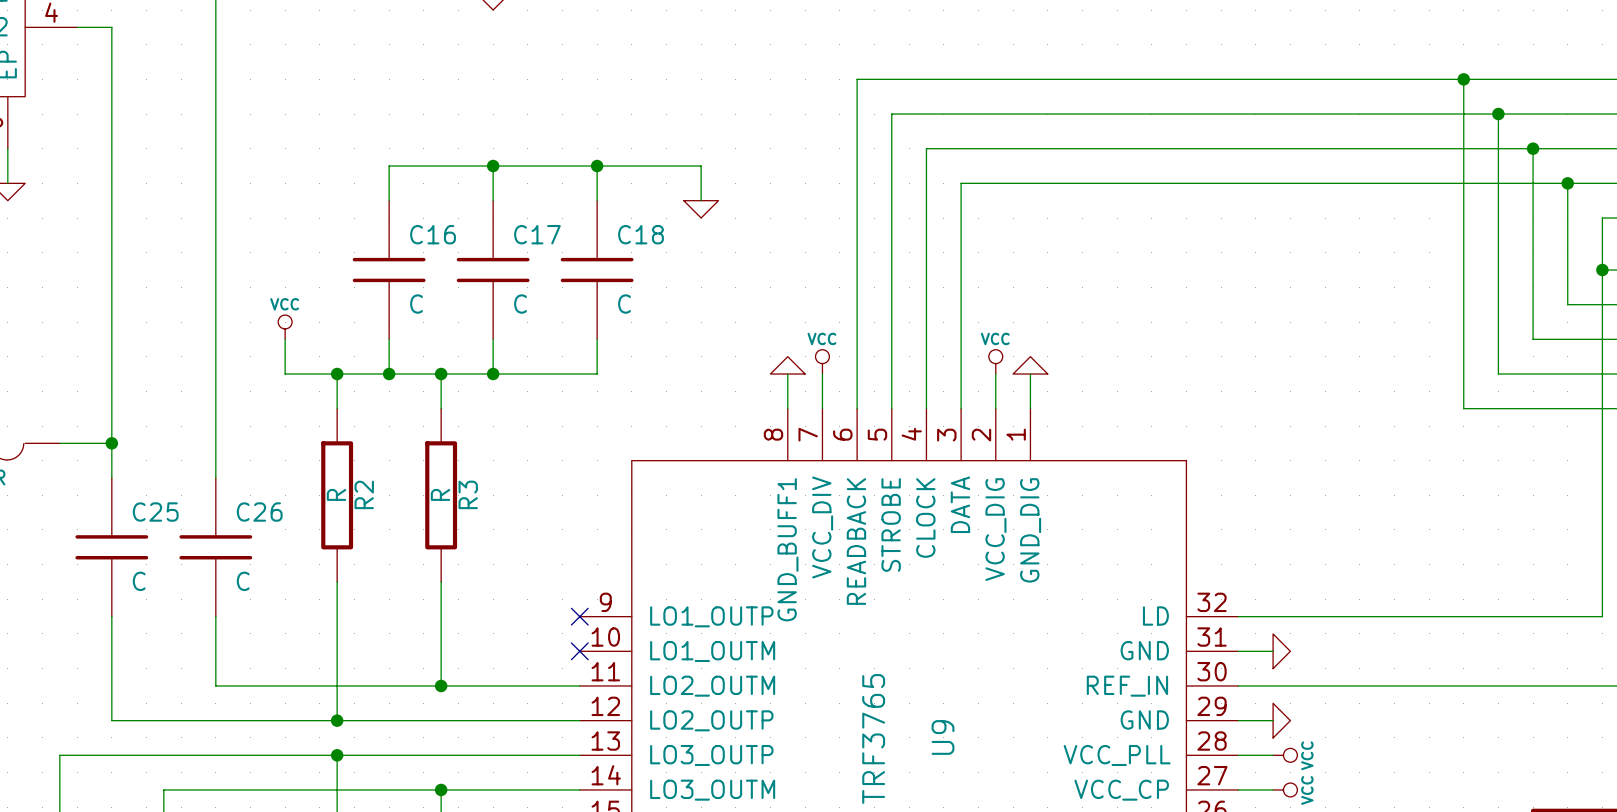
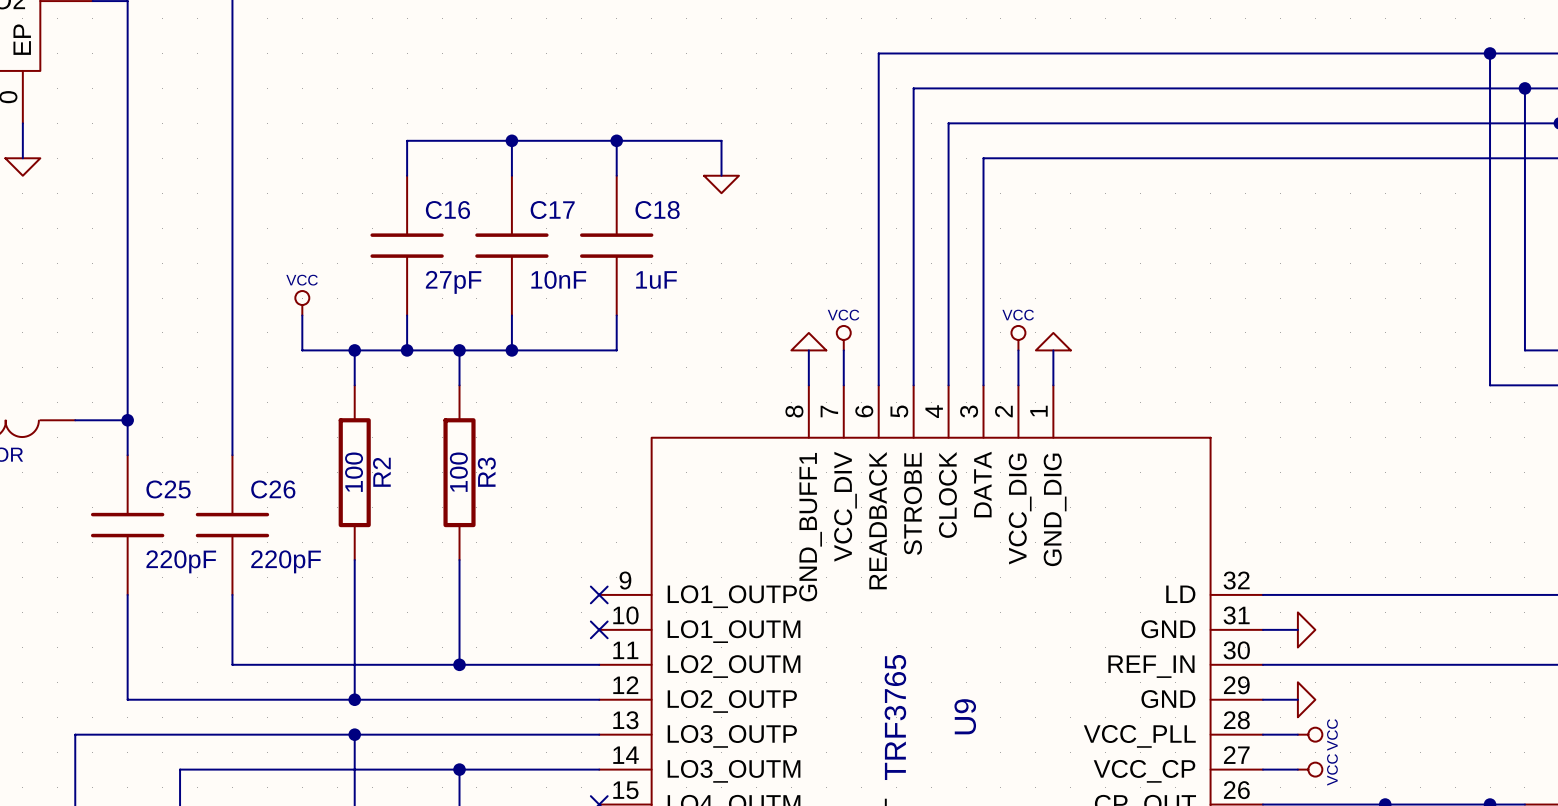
C16 value: C (416, 304) -> 27pF (453, 282)
C17 value: C (520, 304) -> 10nF (558, 279)
C18 value: C (624, 304) -> 1uF (656, 280)
R2 value: R (336, 494) -> 100 (354, 472)
R3 value: R (440, 494) -> 100 (458, 472)
C25 value: C (139, 581) -> 220pF (181, 561)
C26 value: C (243, 581) -> 220pF (286, 561)

